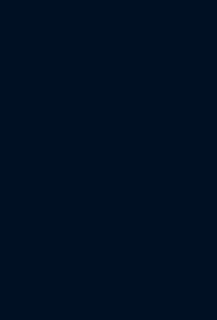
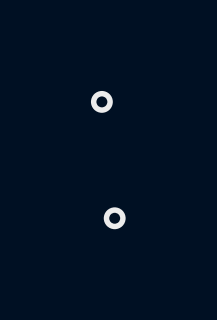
via: none -> (101, 101)
via: none -> (114, 218)

